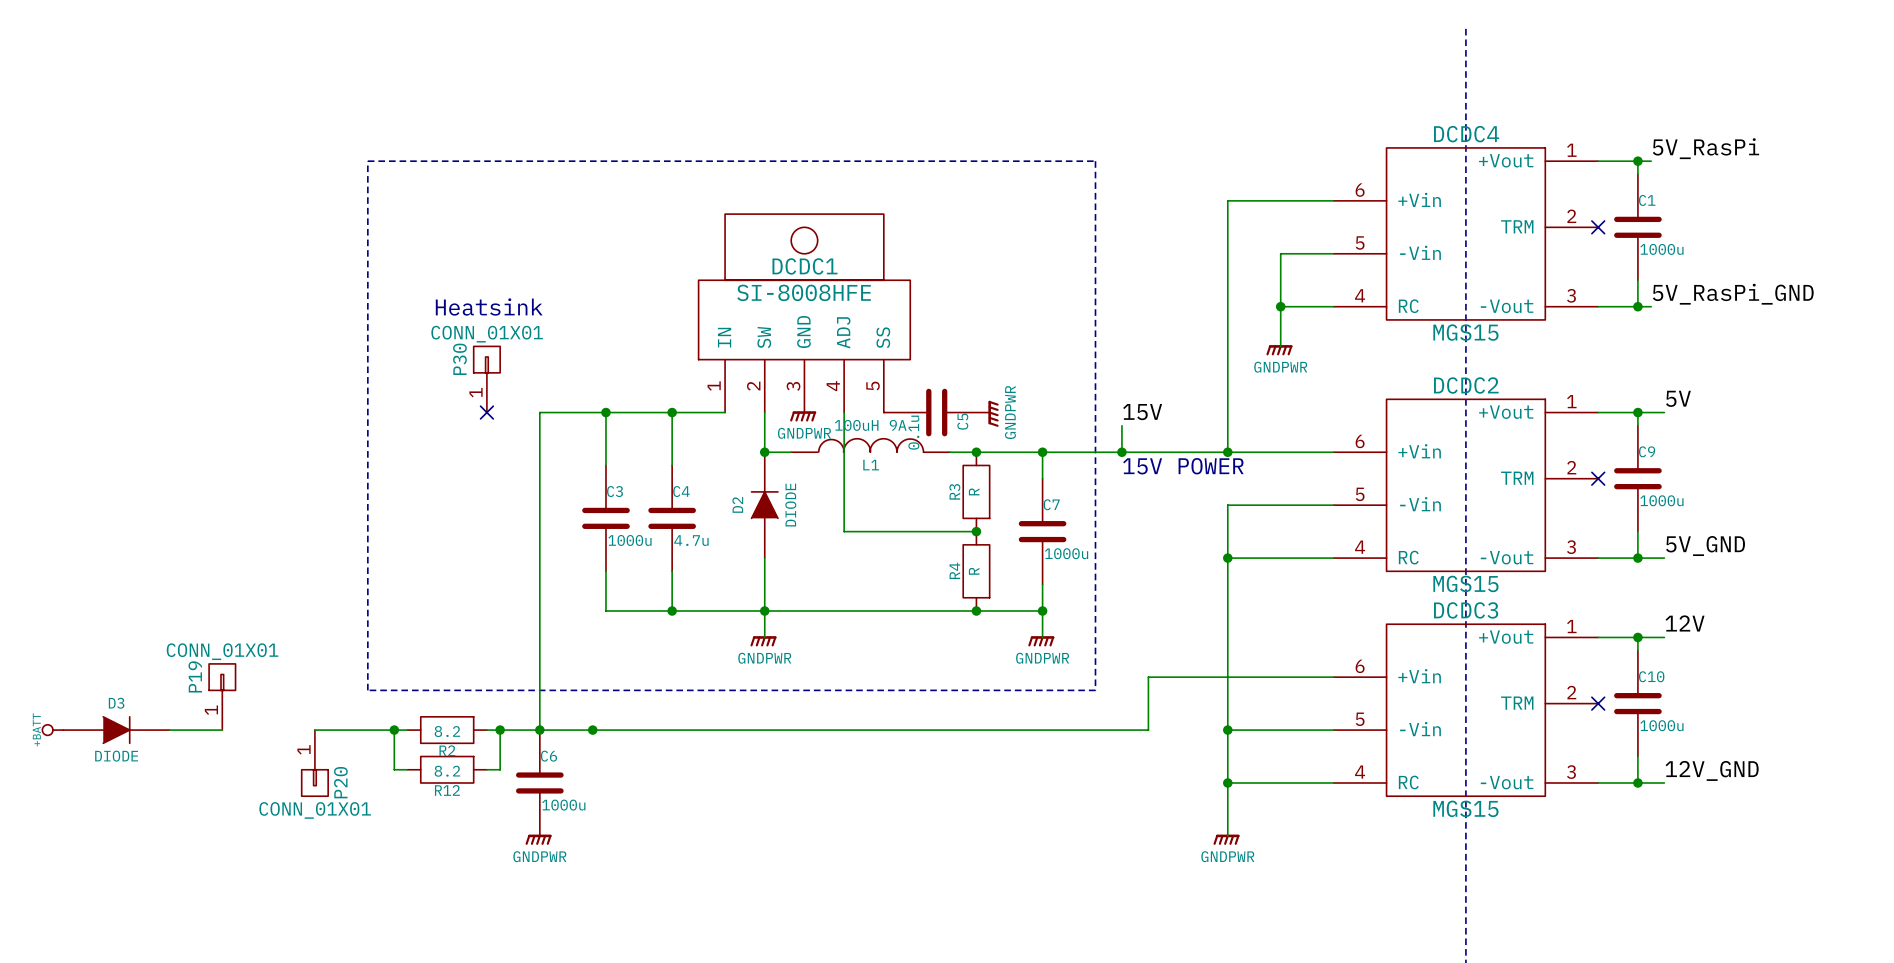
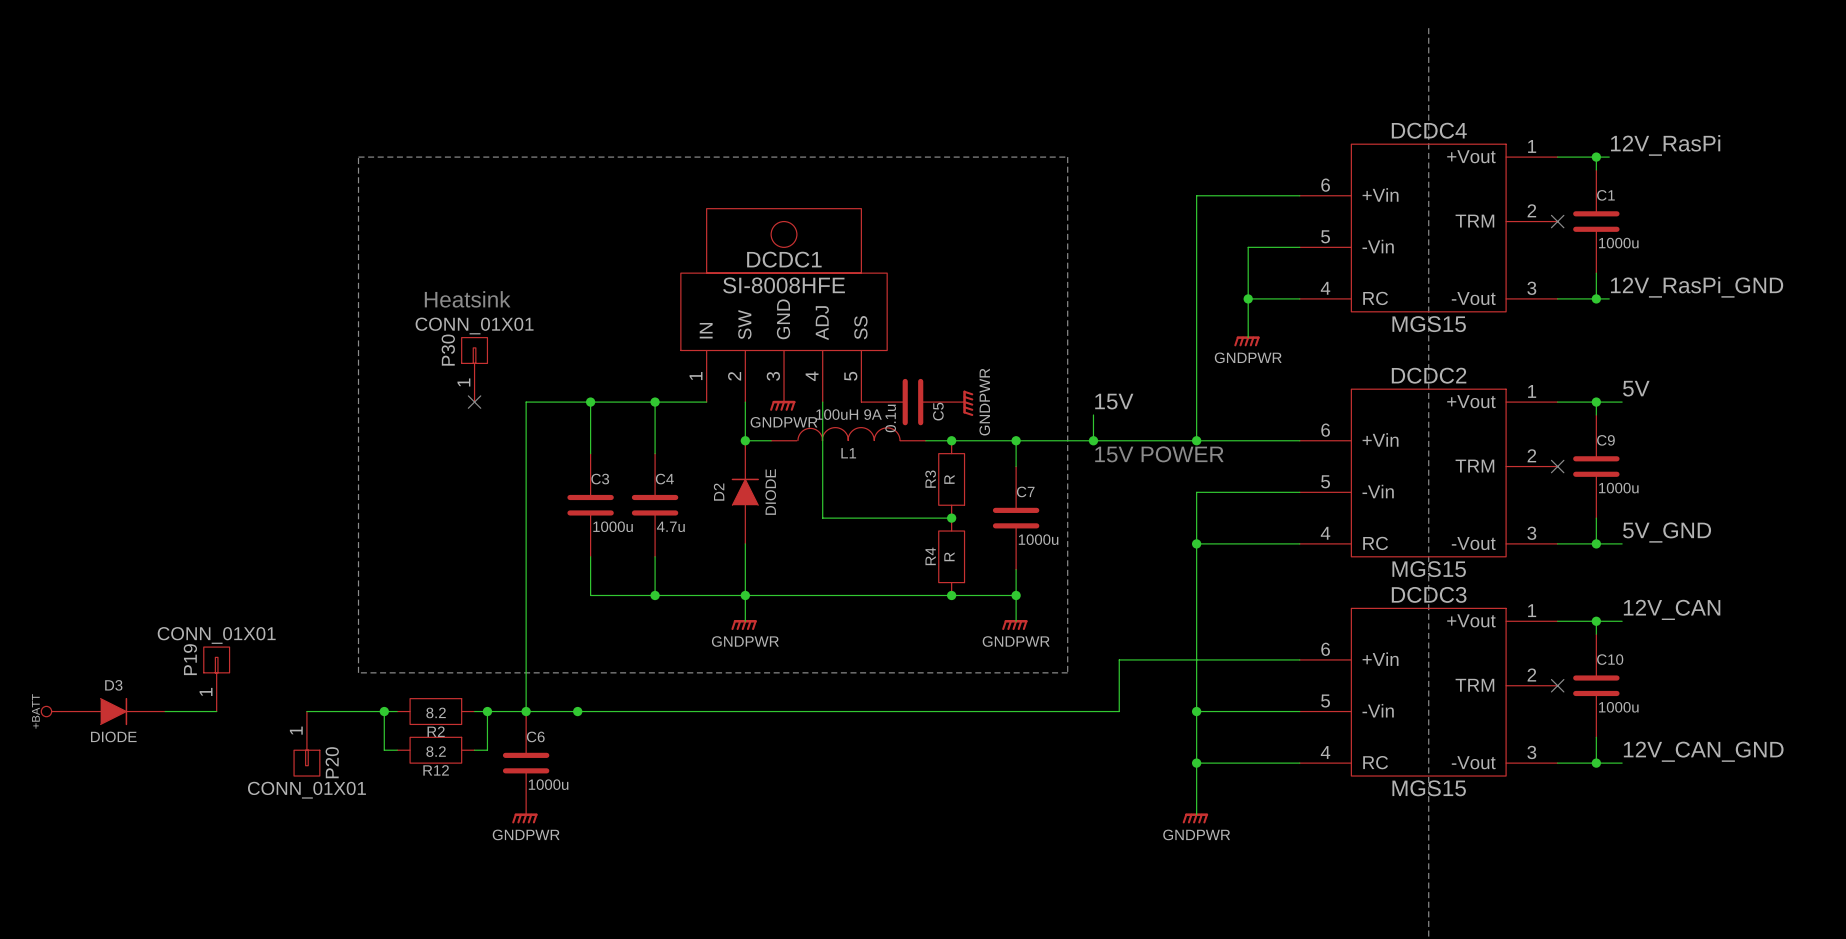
label: 5V_RasPi (1705, 148) -> 12V_RasPi (1665, 145)
label: 5V_RasPi_GND (1733, 294) -> 12V_RasPi_GND (1697, 287)
label: 12V (1685, 623) -> 12V_CAN (1672, 609)
label: 12V_GND (1712, 770) -> 12V_CAN_GND (1703, 751)

